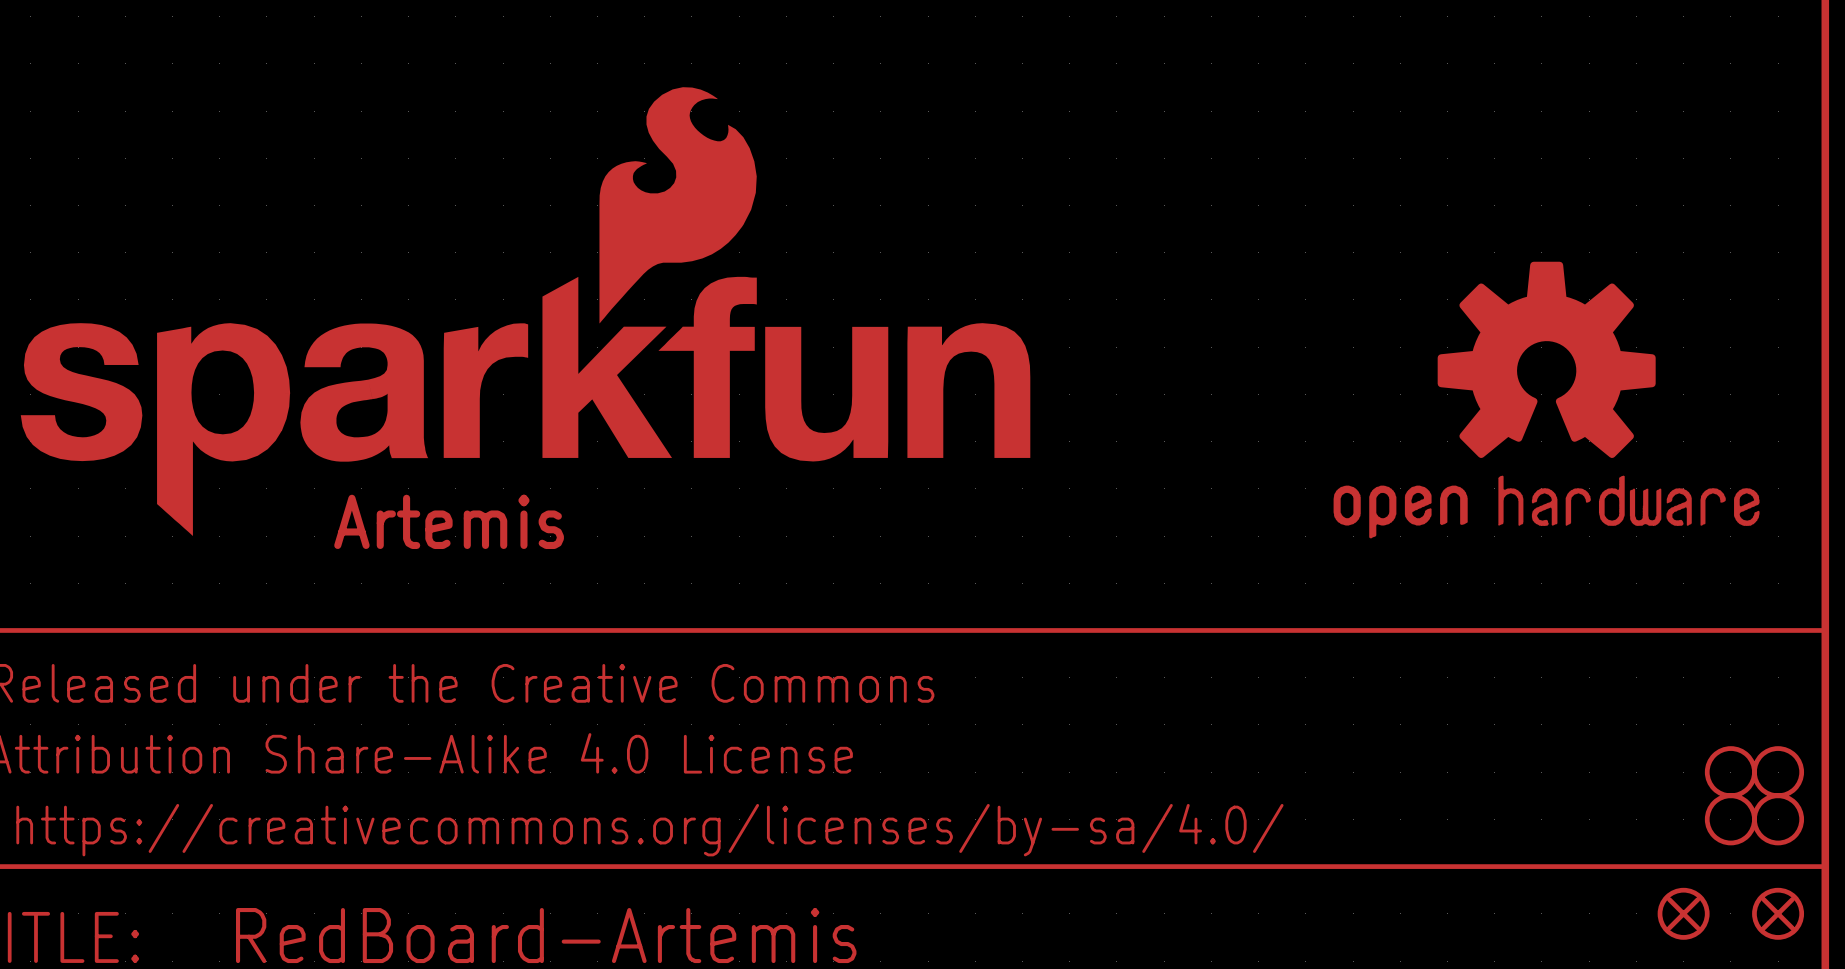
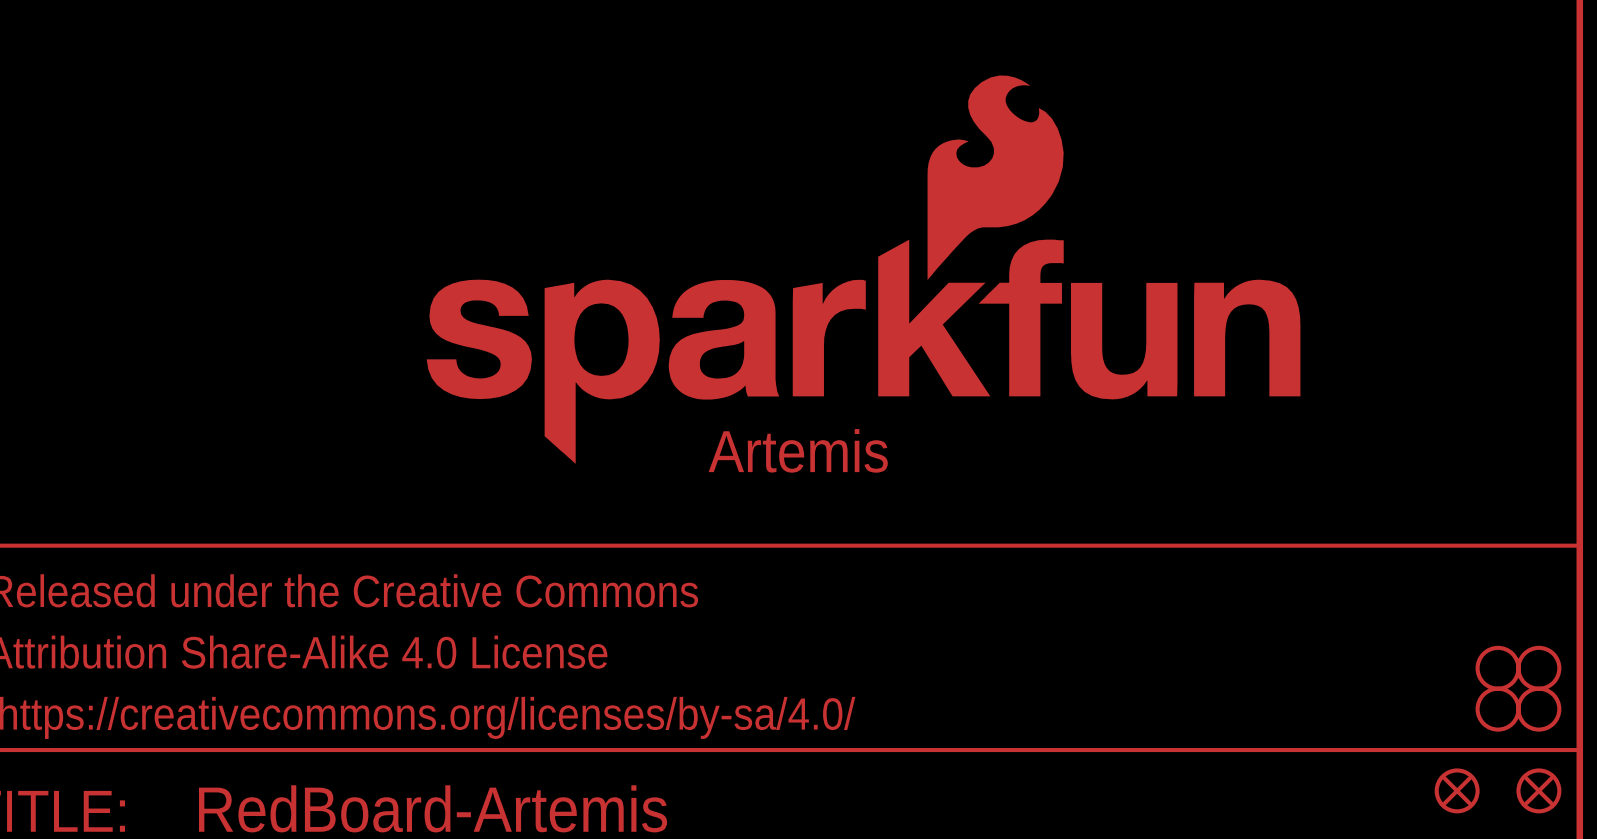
part: (678, 205) -> none
part: none -> (995, 177)
part: (1546, 400) -> none
part: (525, 406) -> none
part: none -> (863, 351)
text: Artemis (449, 521) -> none
text: none -> Artemis (798, 450)

